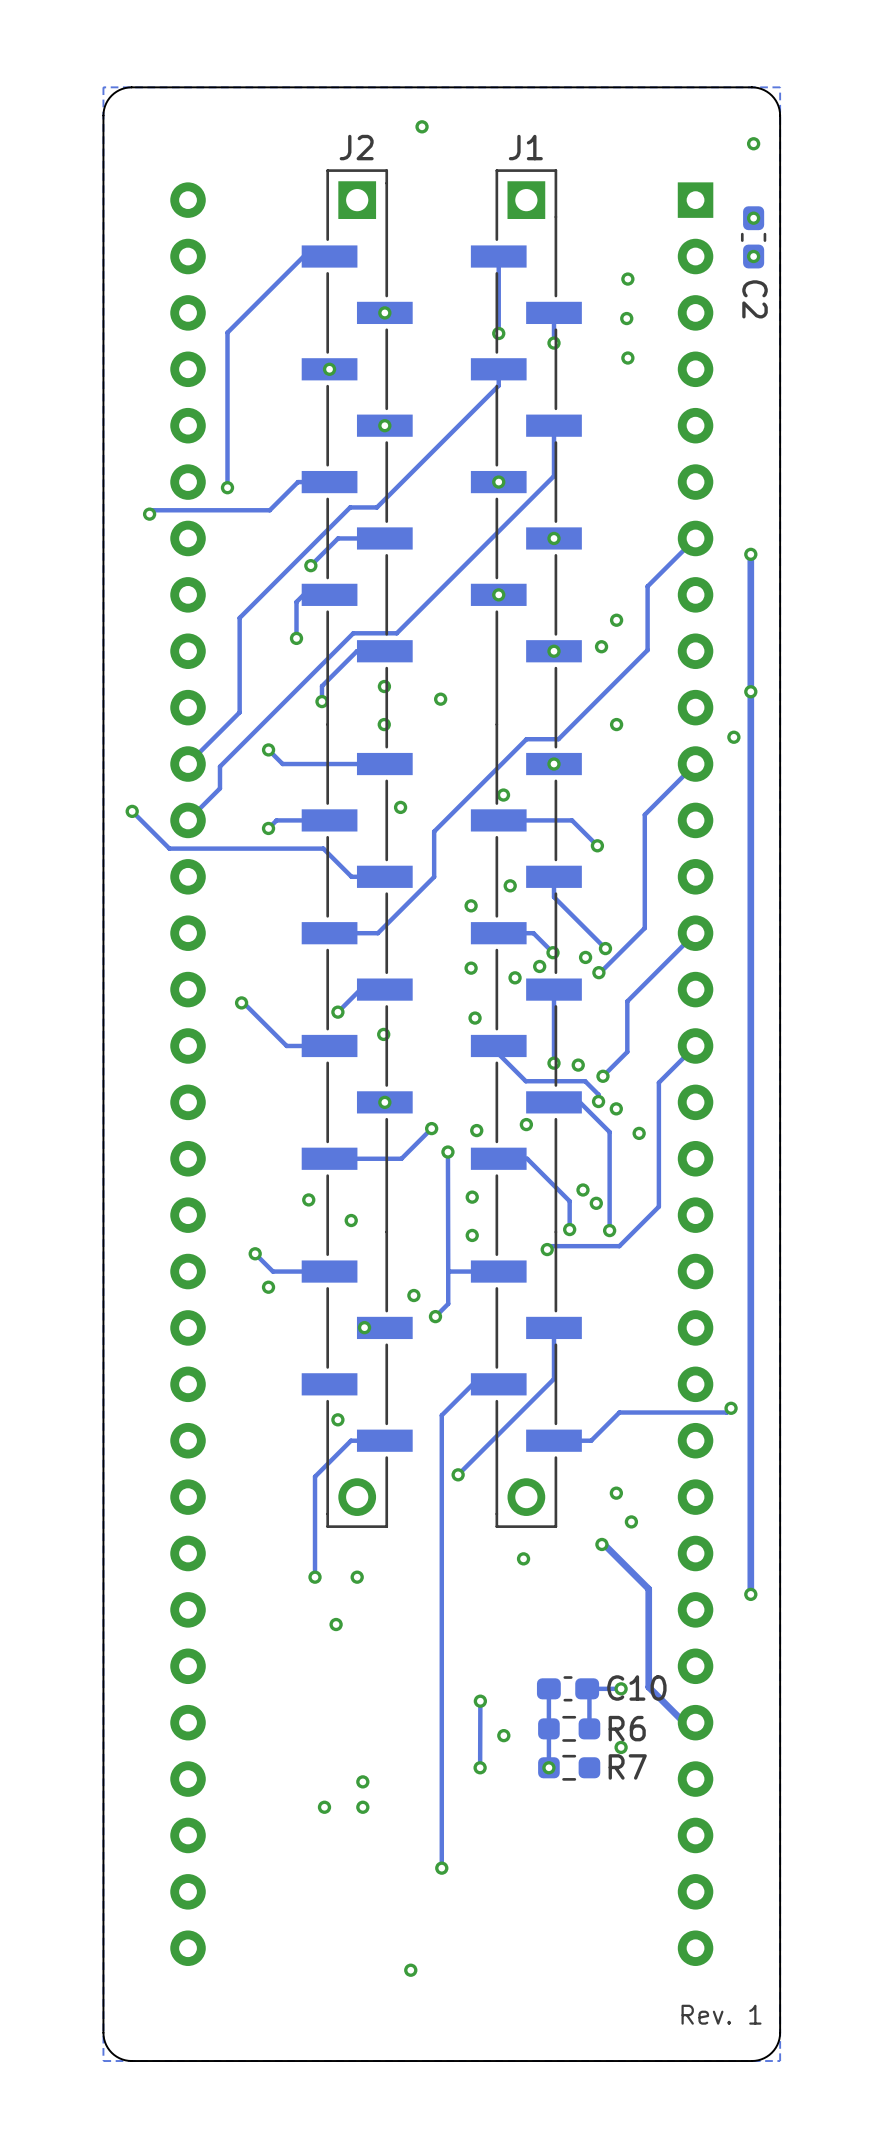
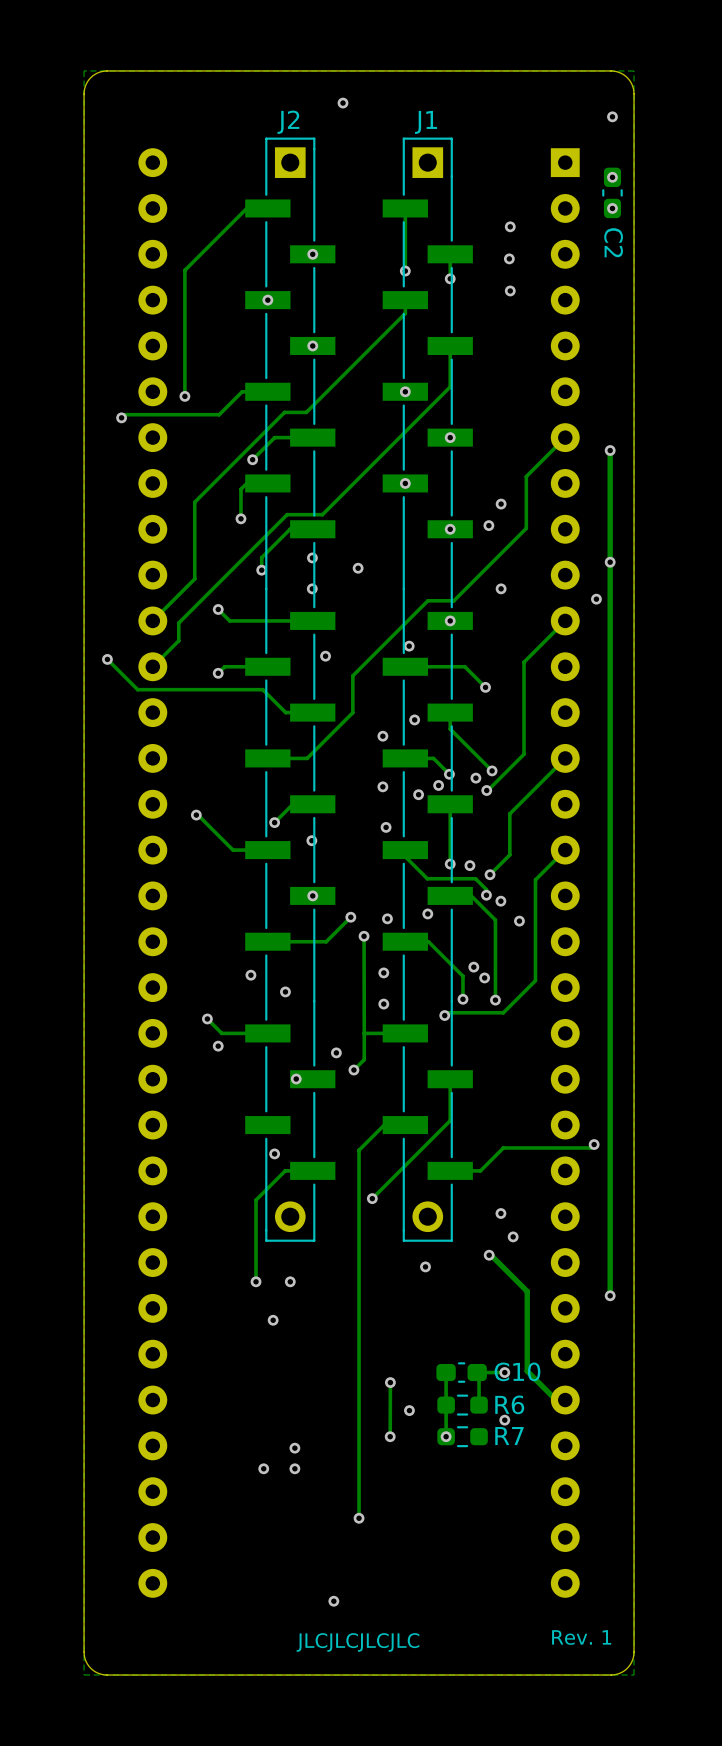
text: none -> JLCJLCJLCJLC (357, 1642)

